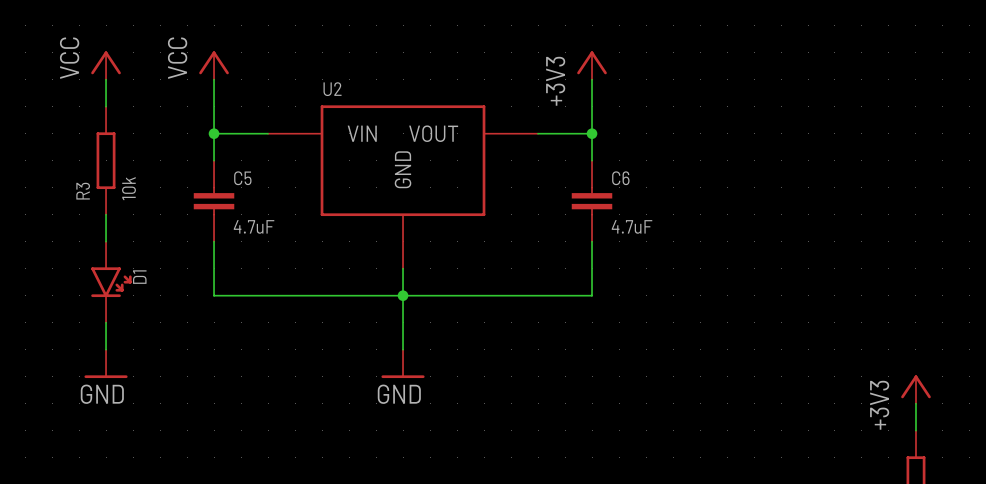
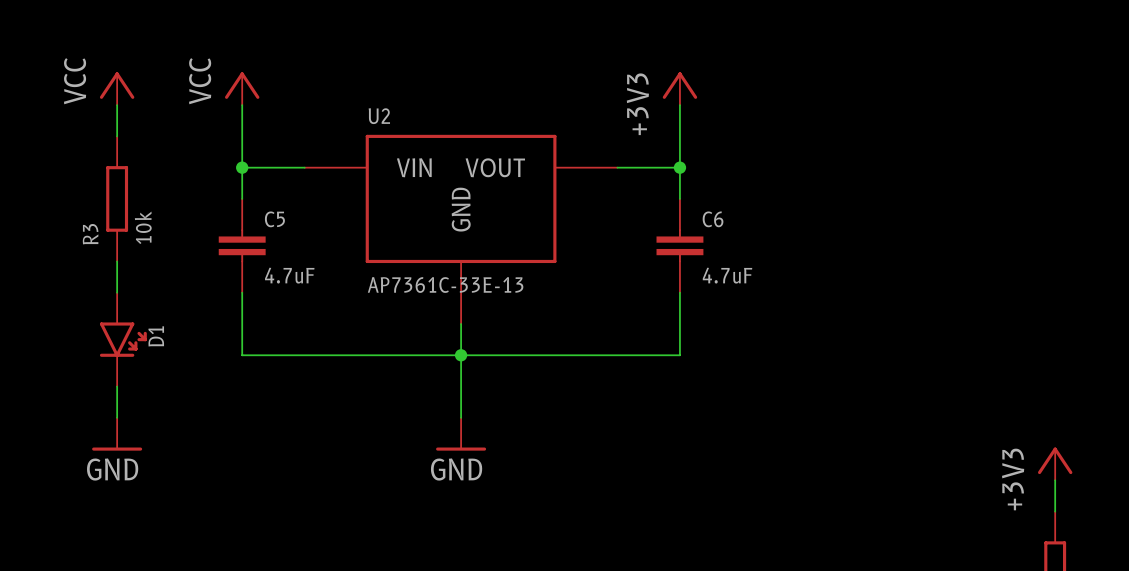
U2 value: none -> AP7361C-33E-13 (445, 285)

